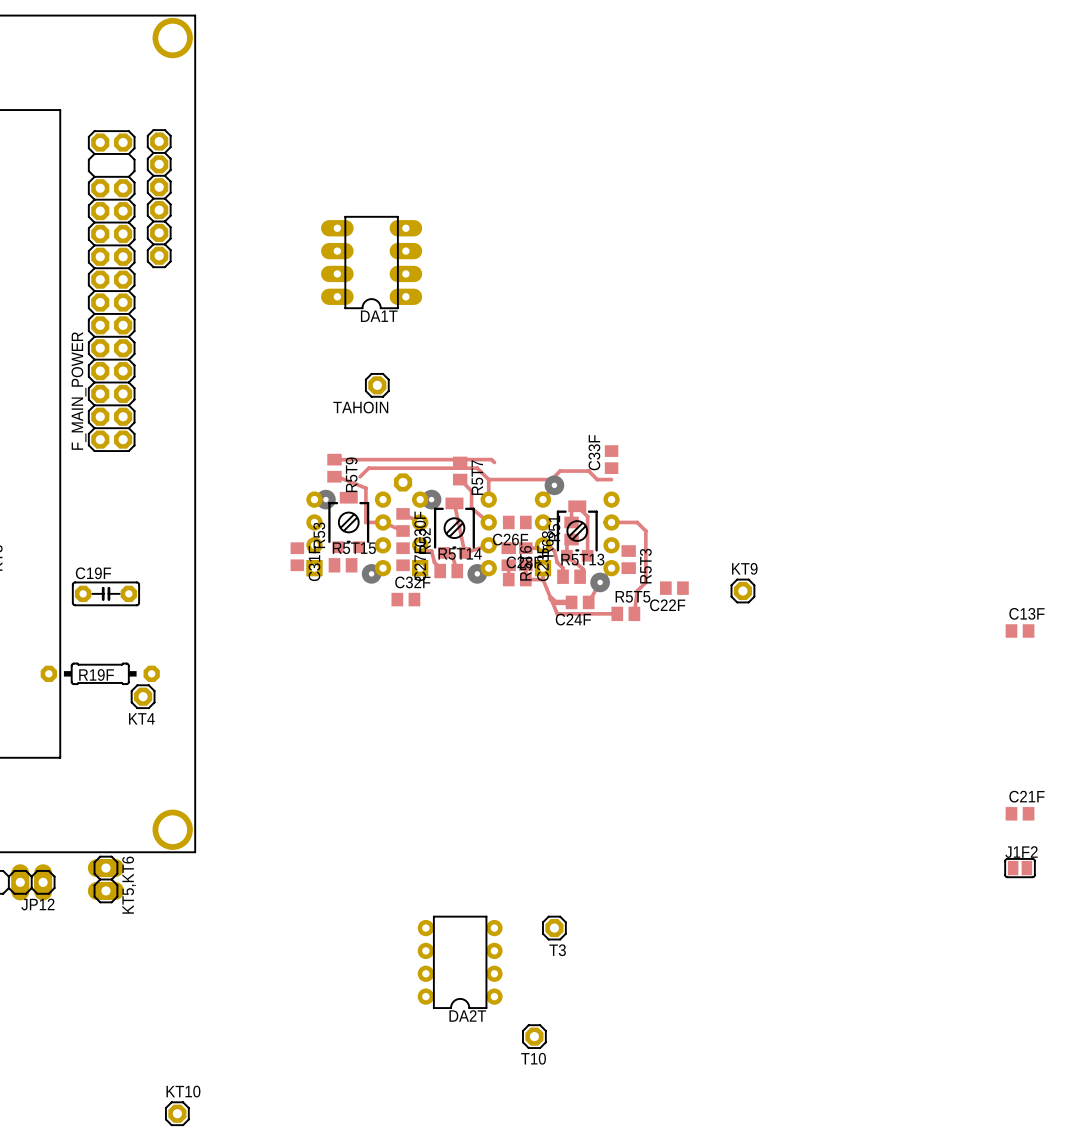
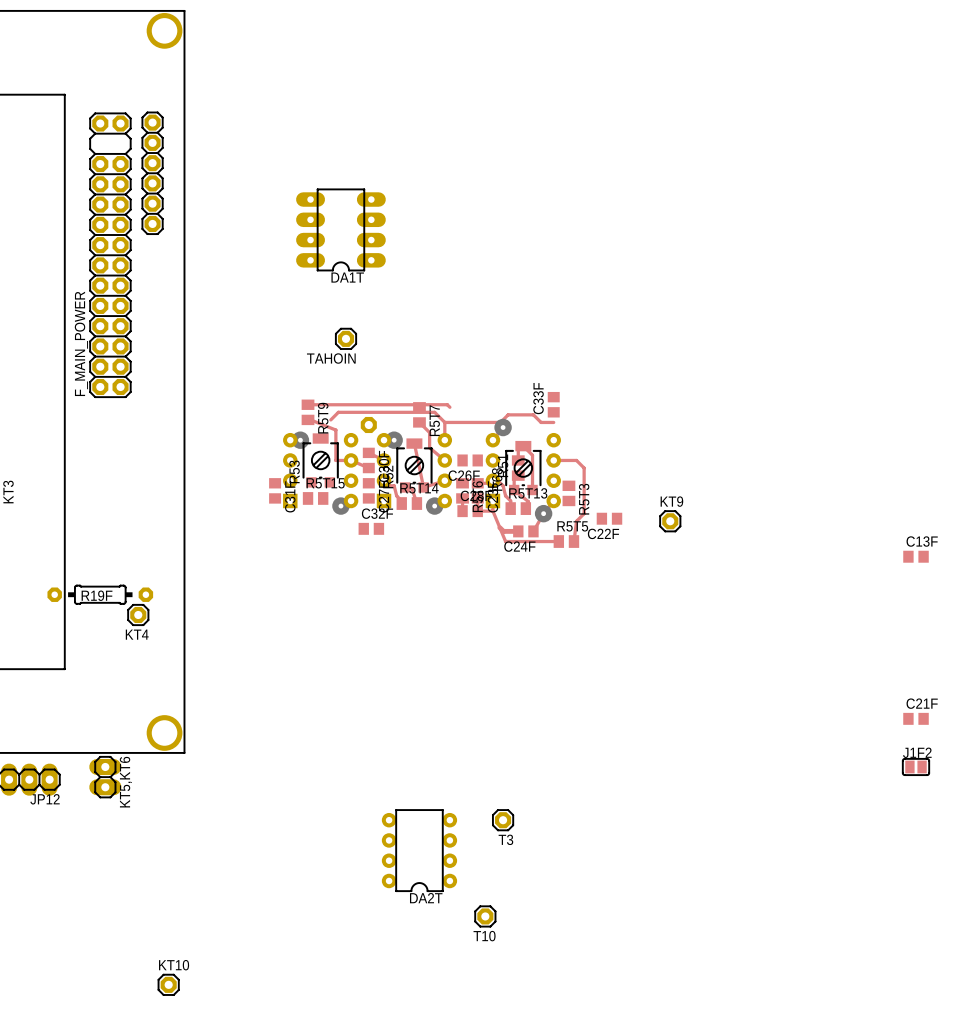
C19F: (105, 593) -> none

